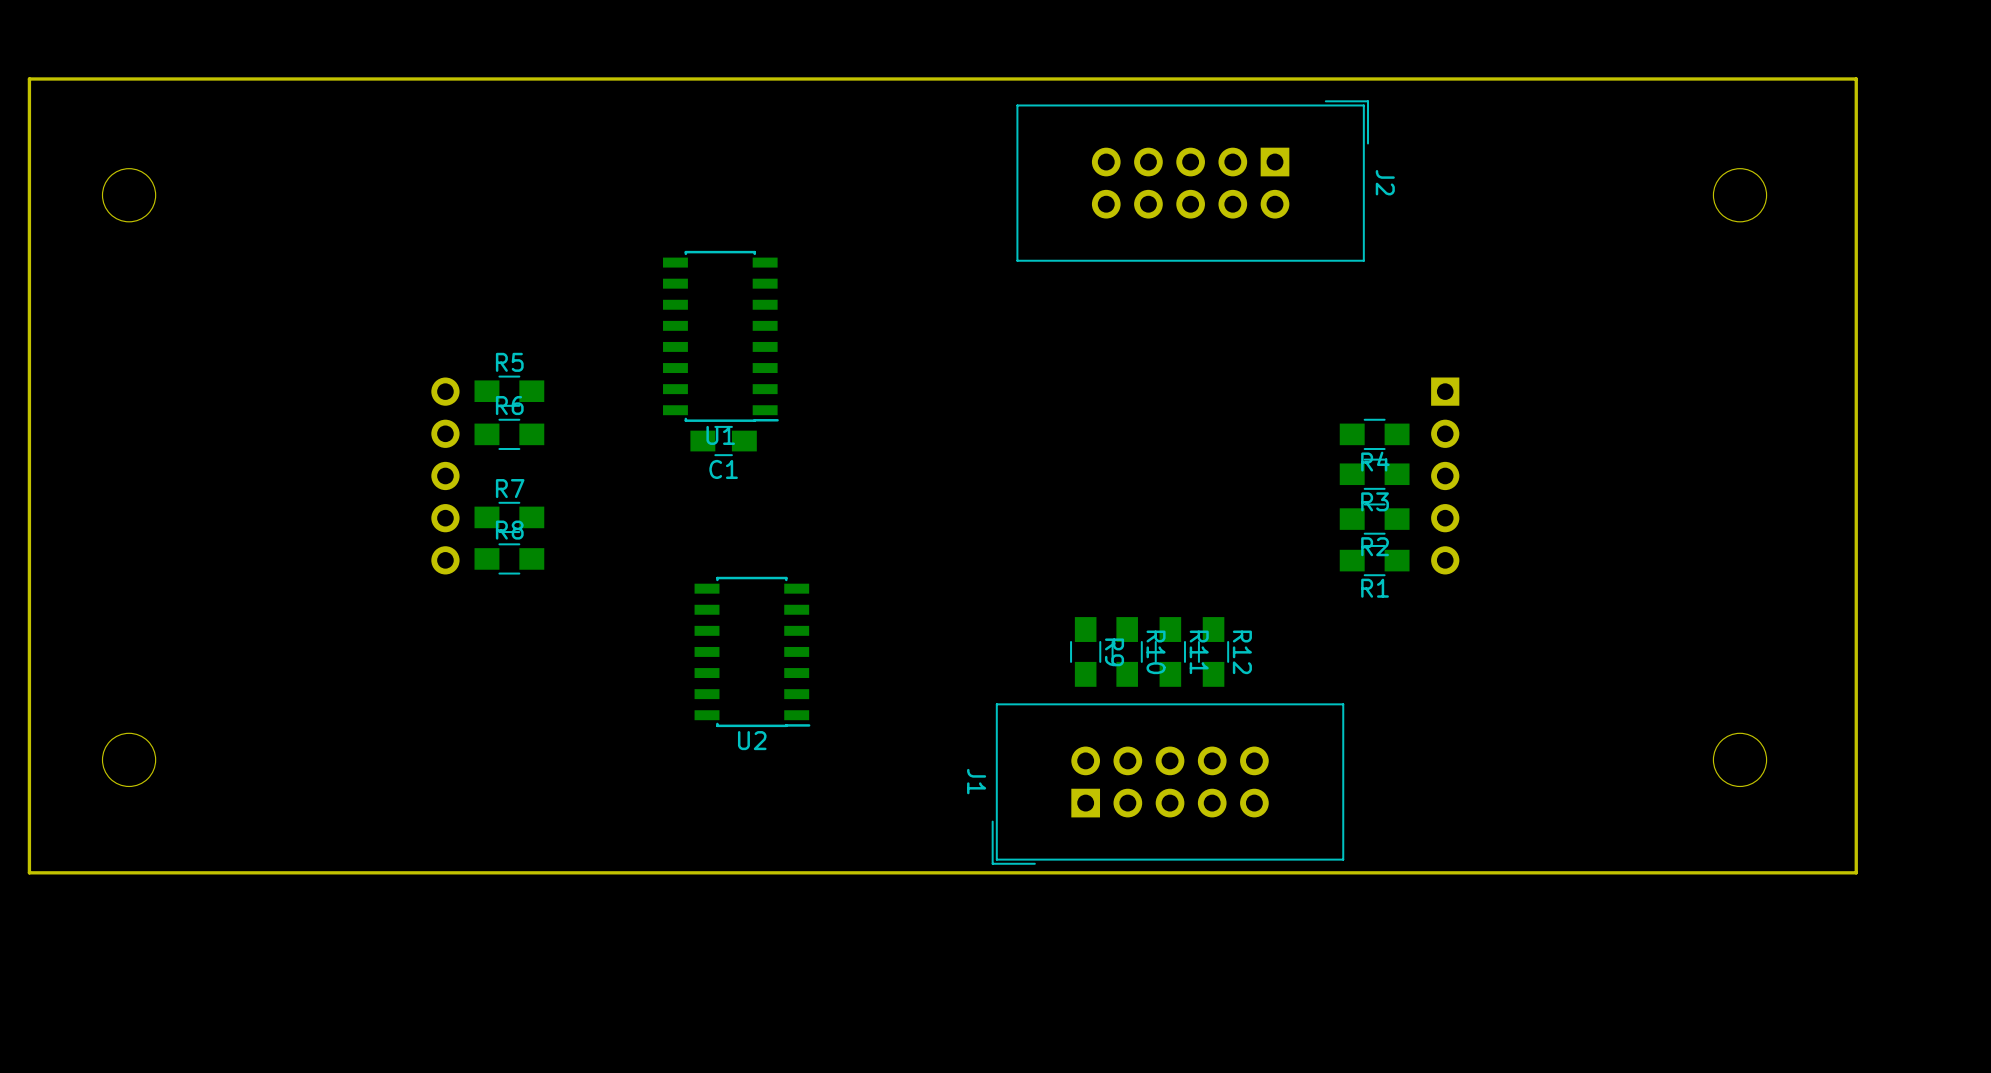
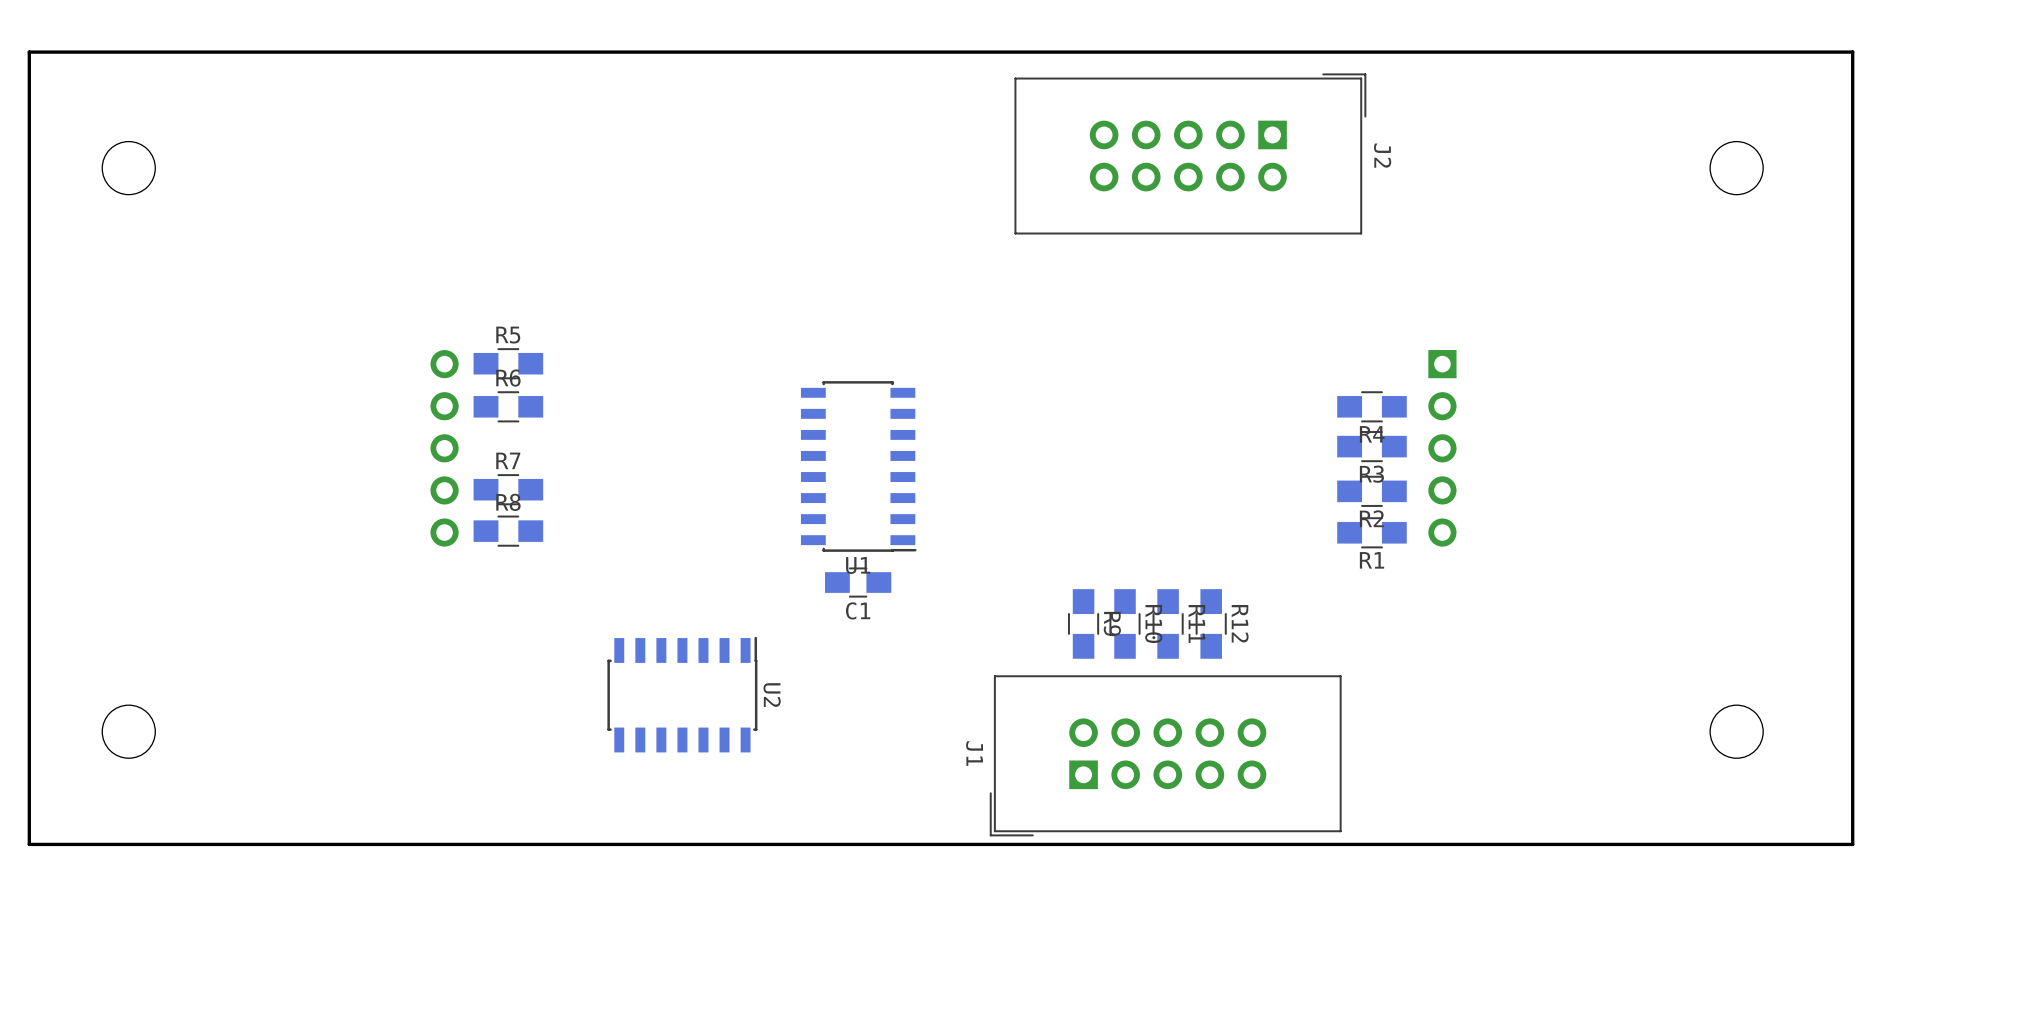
U1 position: (720, 336) -> (858, 466)
C1 position: (723, 441) -> (858, 582)
U2 rotation: 0° (752, 651) -> 90° counterclockwise (682, 694)
U2 position: (752, 651) -> (682, 694)

